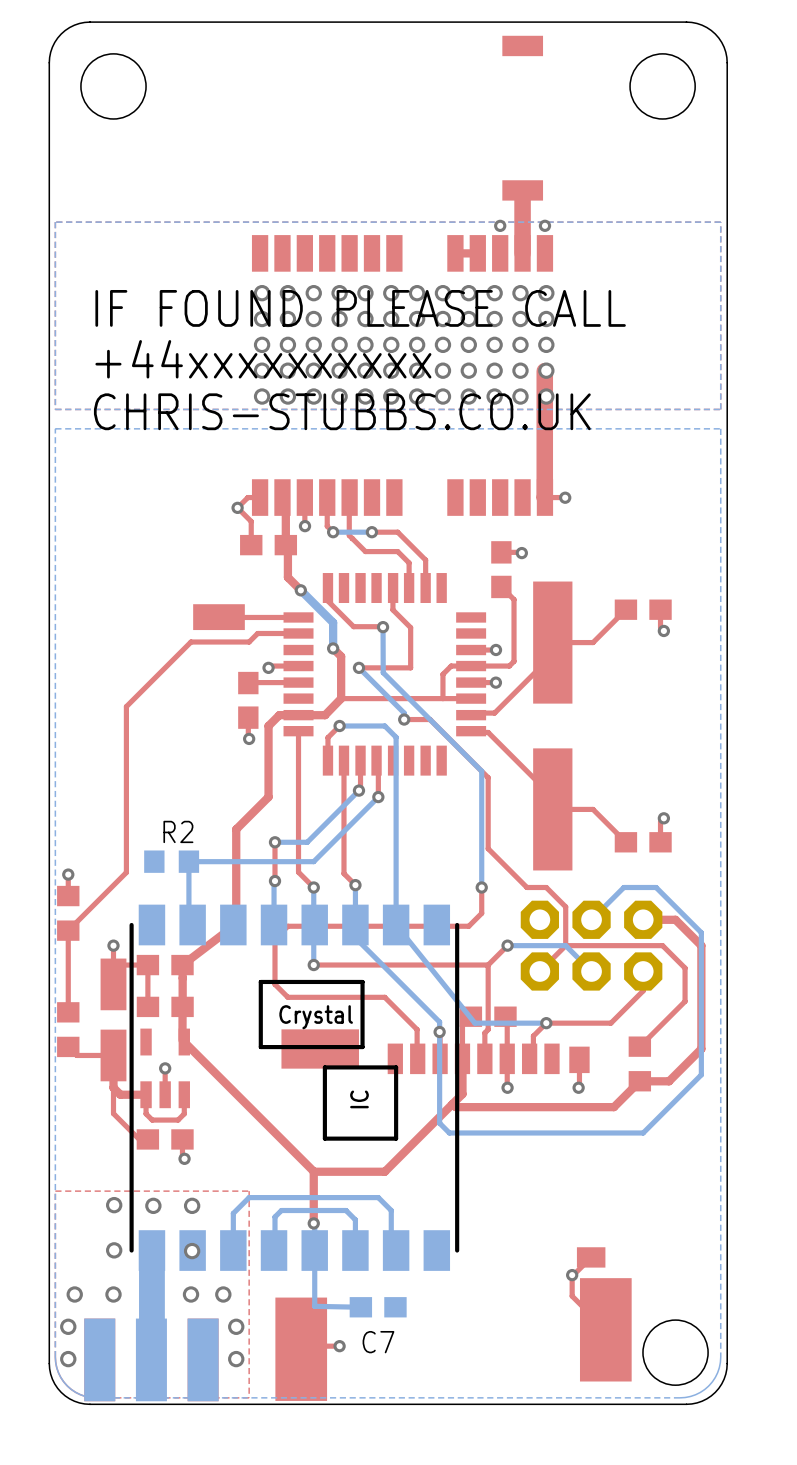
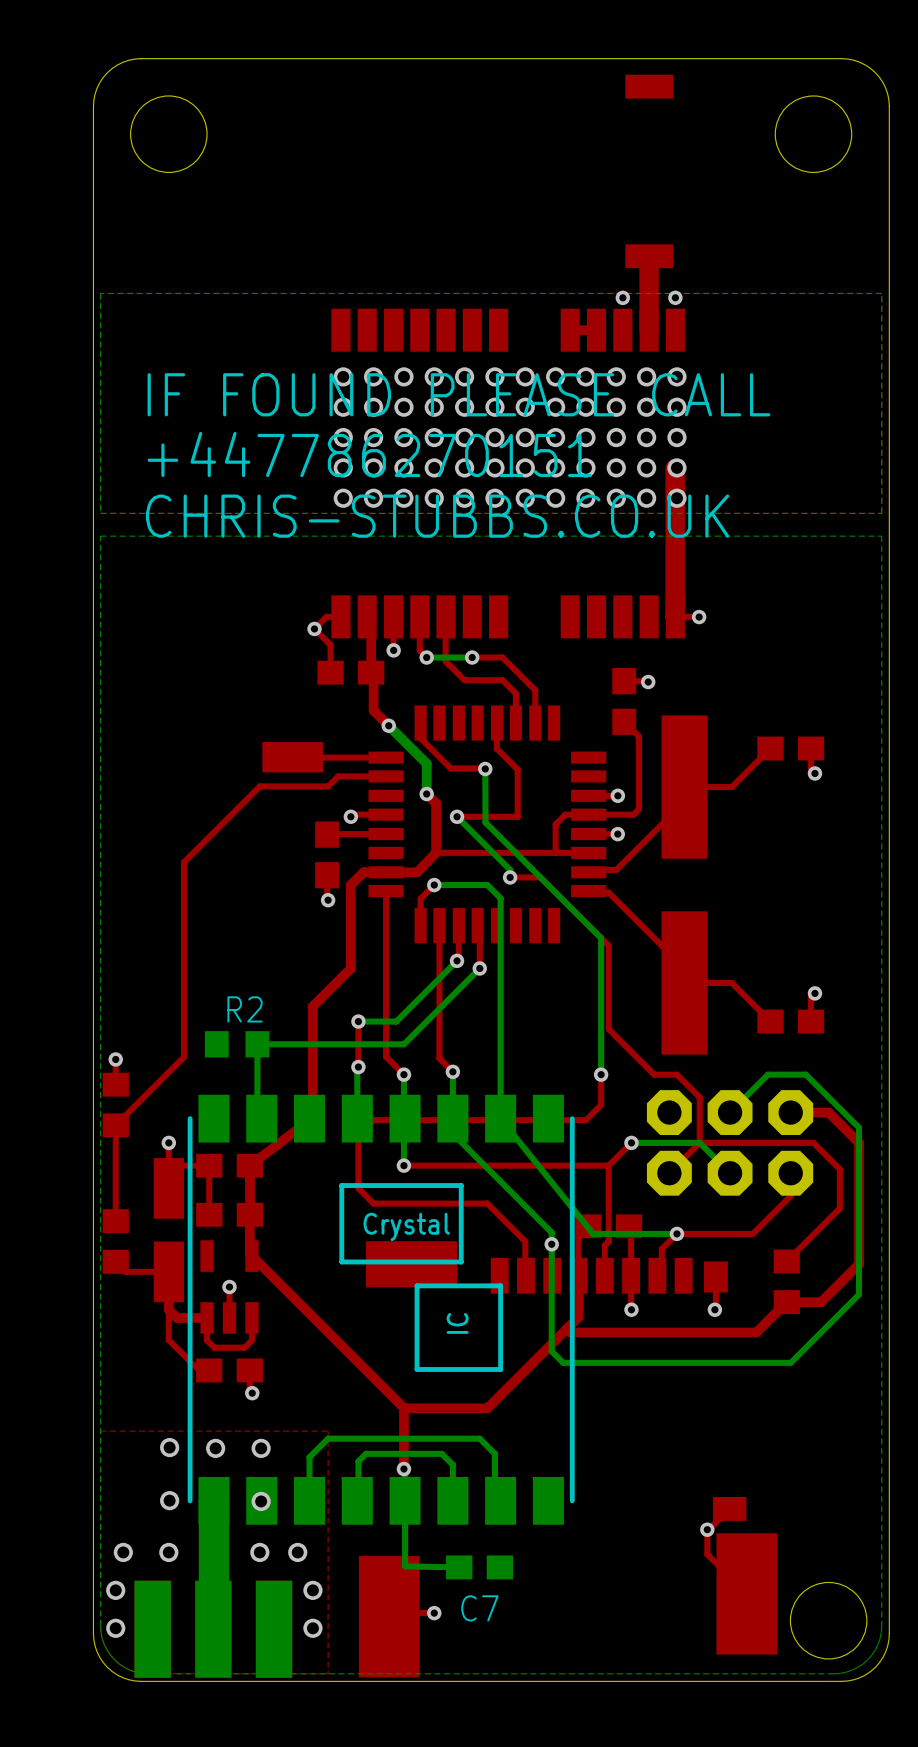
text: +44xxxxxxxxxx (263, 359) -> +447786270151 (369, 454)

